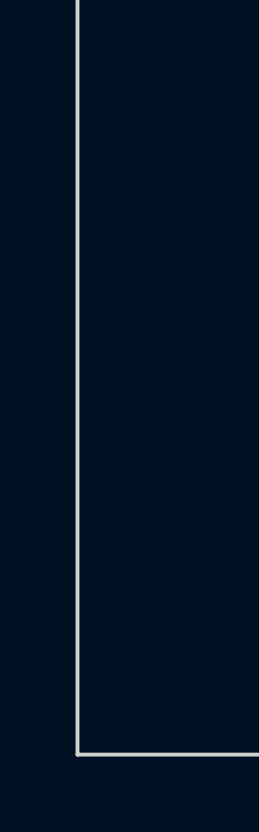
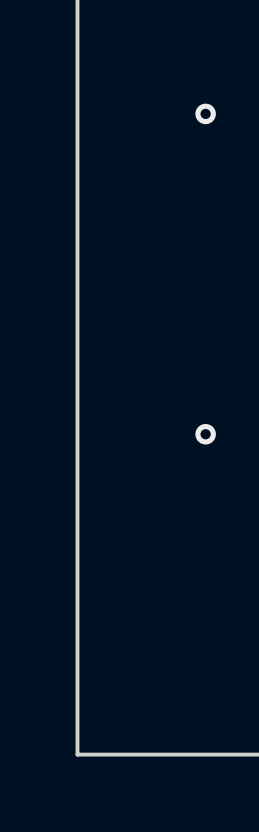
via: none -> (205, 113)
via: none -> (205, 434)

